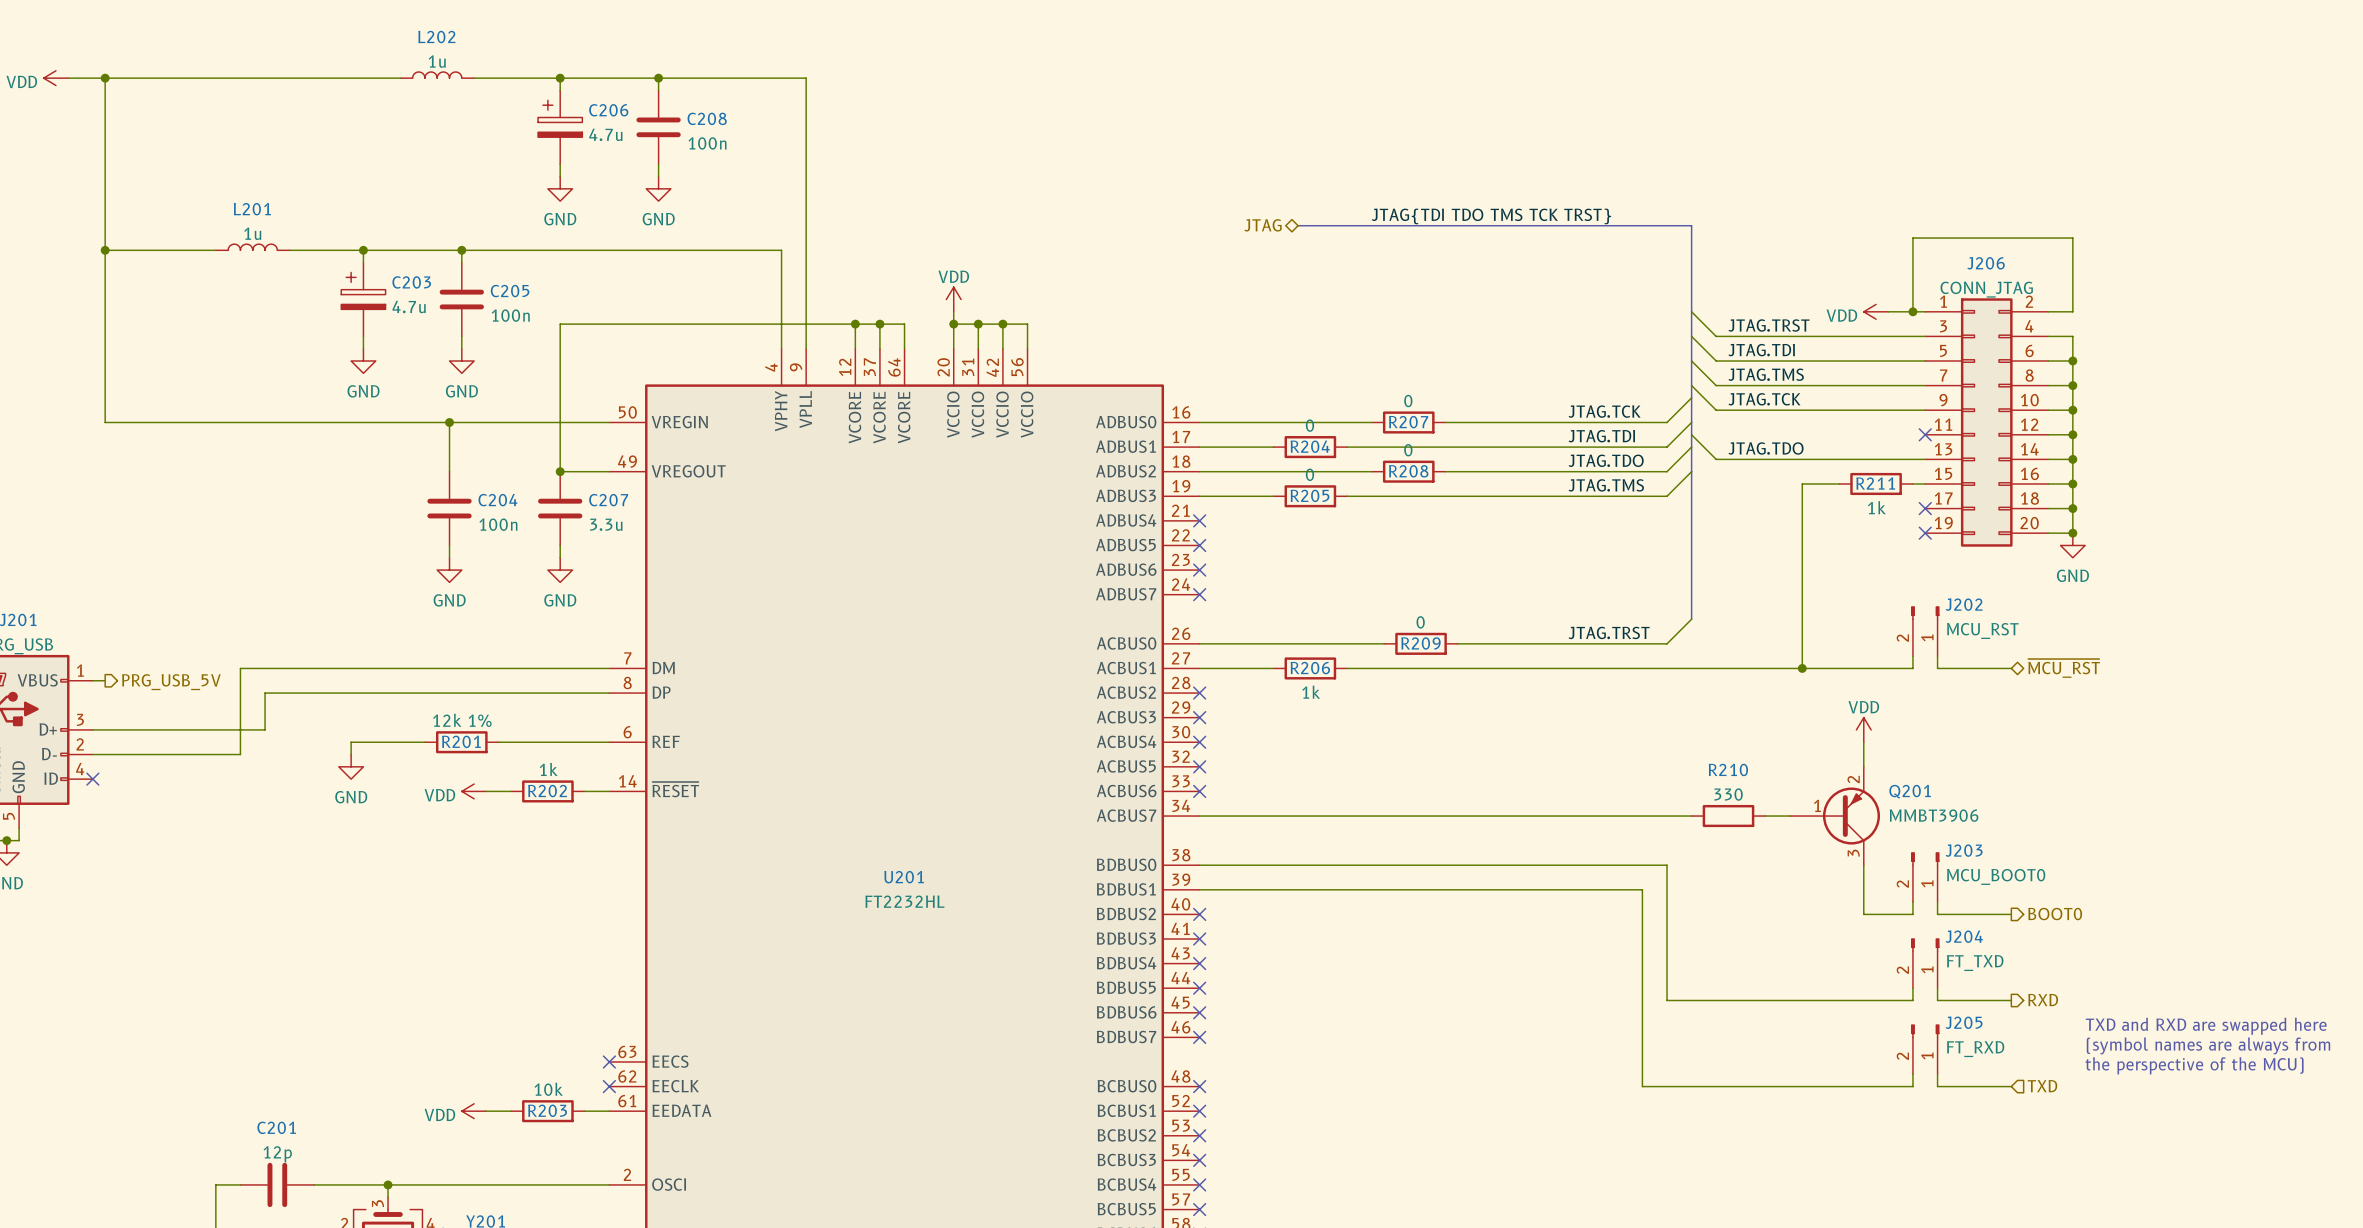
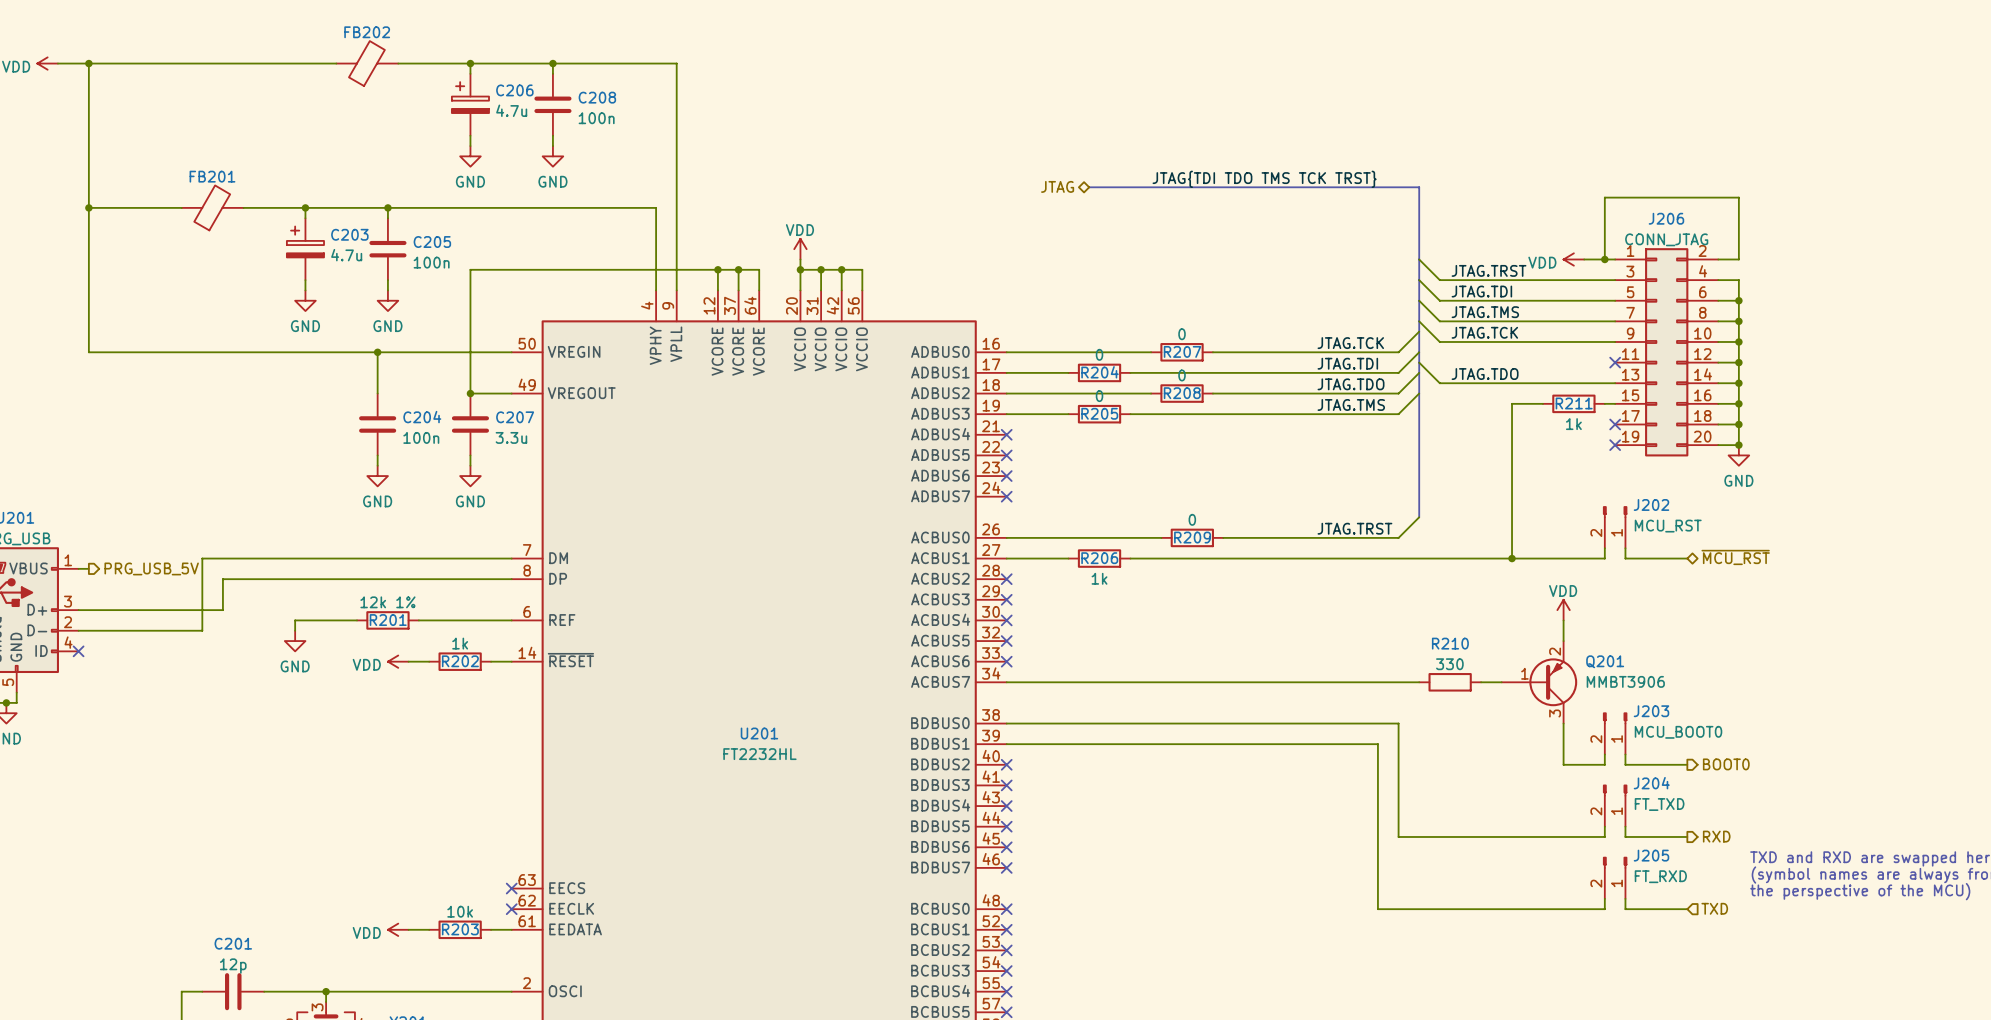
L202: 1u (437, 75) -> none
FB202: none -> (367, 63)
L201: 1u (252, 247) -> none
FB201: none -> (212, 207)

